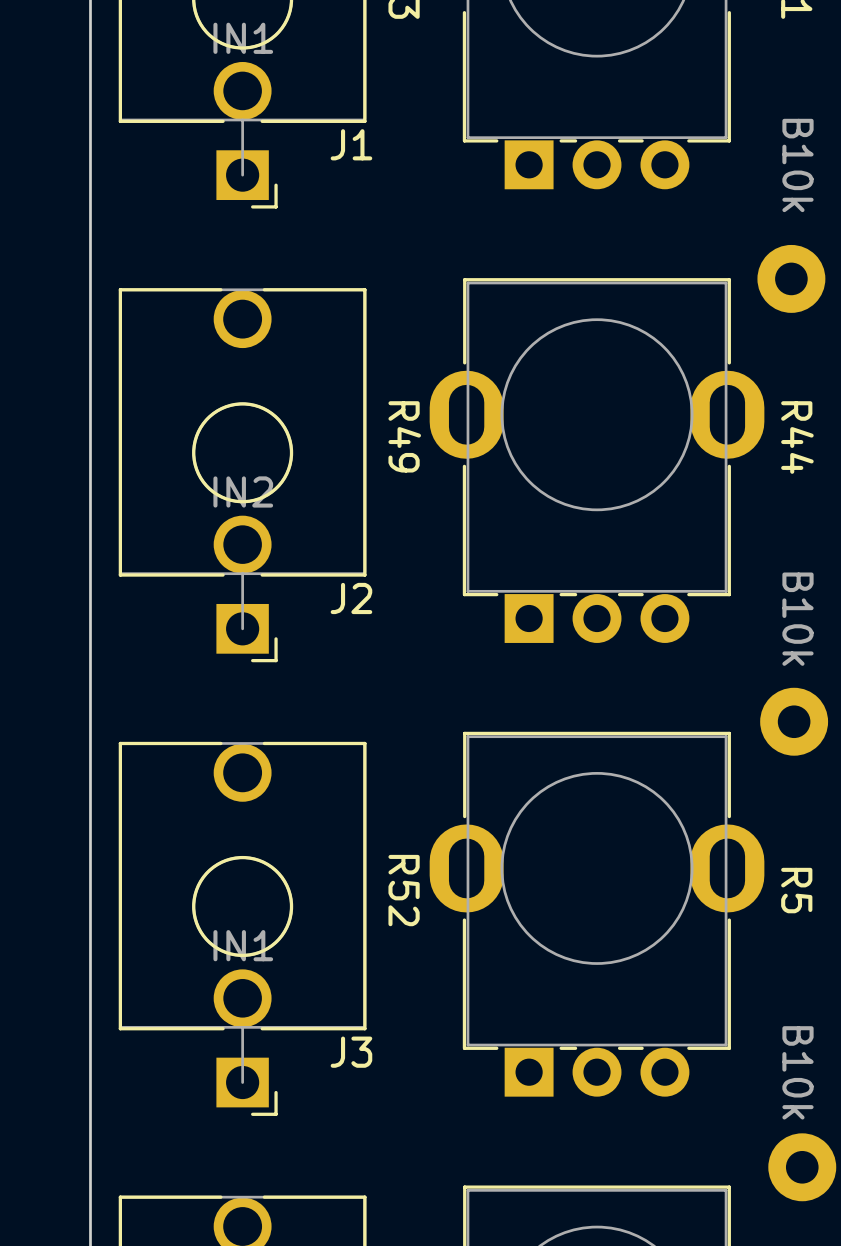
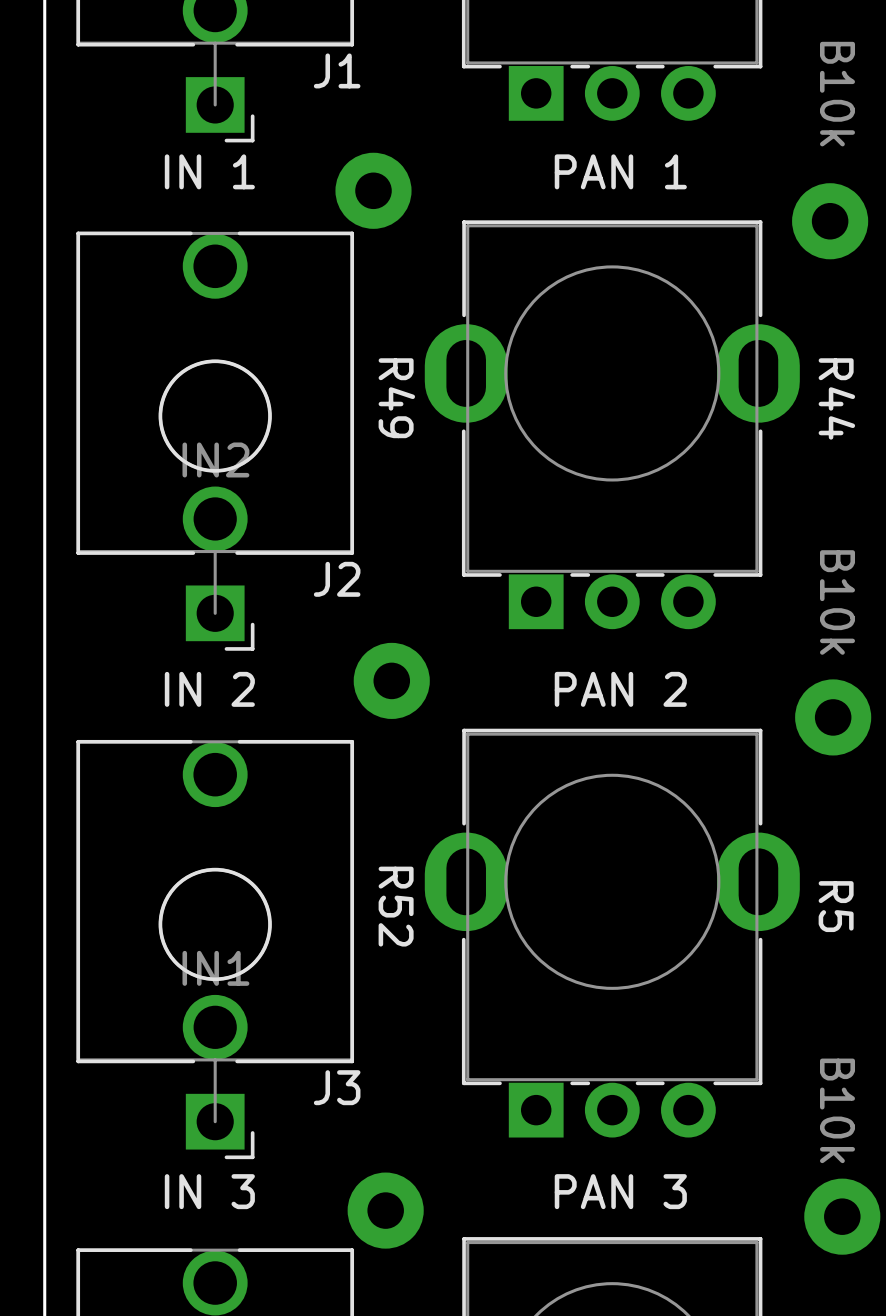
text: none -> IN 1 (209, 171)
text: none -> PAN 1 (620, 171)
part: none -> (373, 190)
part: none -> (391, 680)
text: none -> IN 2 (209, 689)
text: none -> PAN 2 (620, 689)
text: none -> IN 3 (209, 1191)
text: none -> PAN 3 (620, 1191)
part: none -> (385, 1210)

